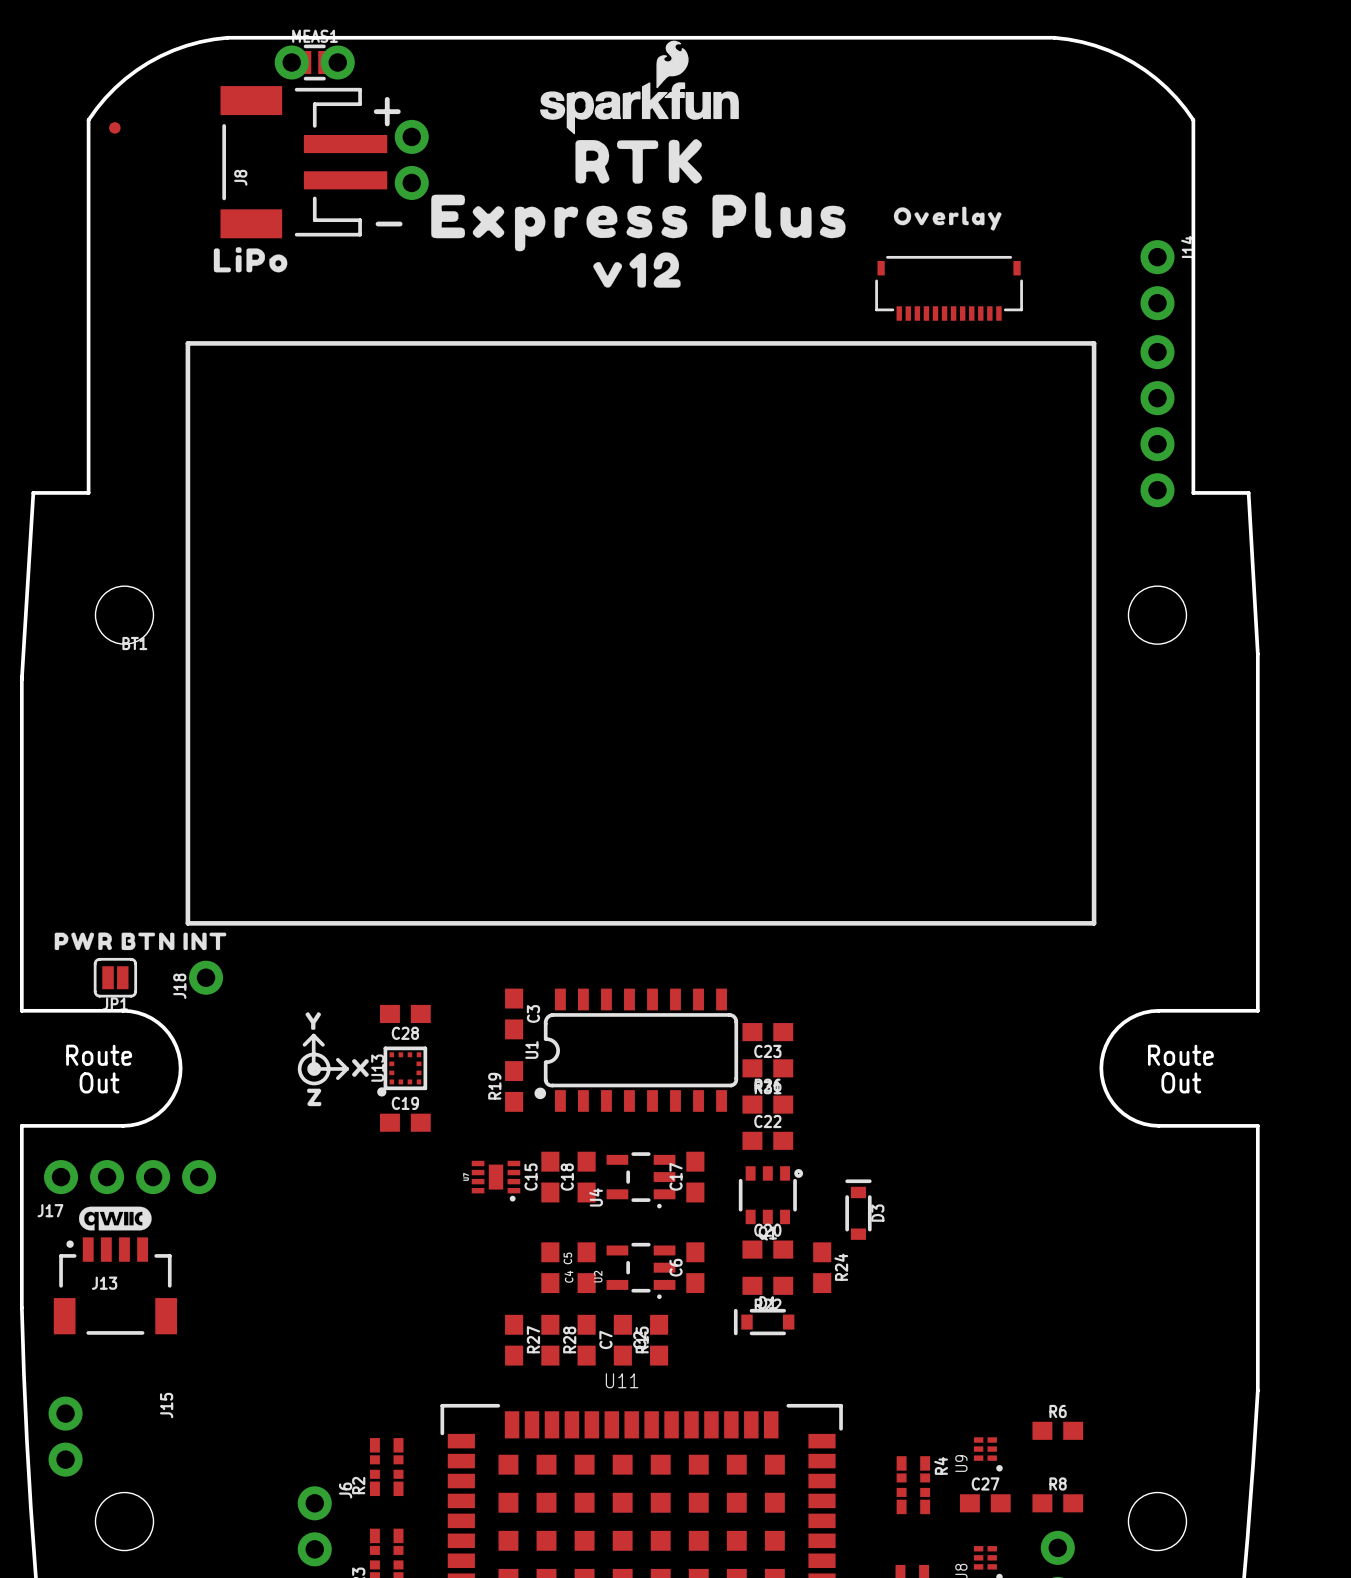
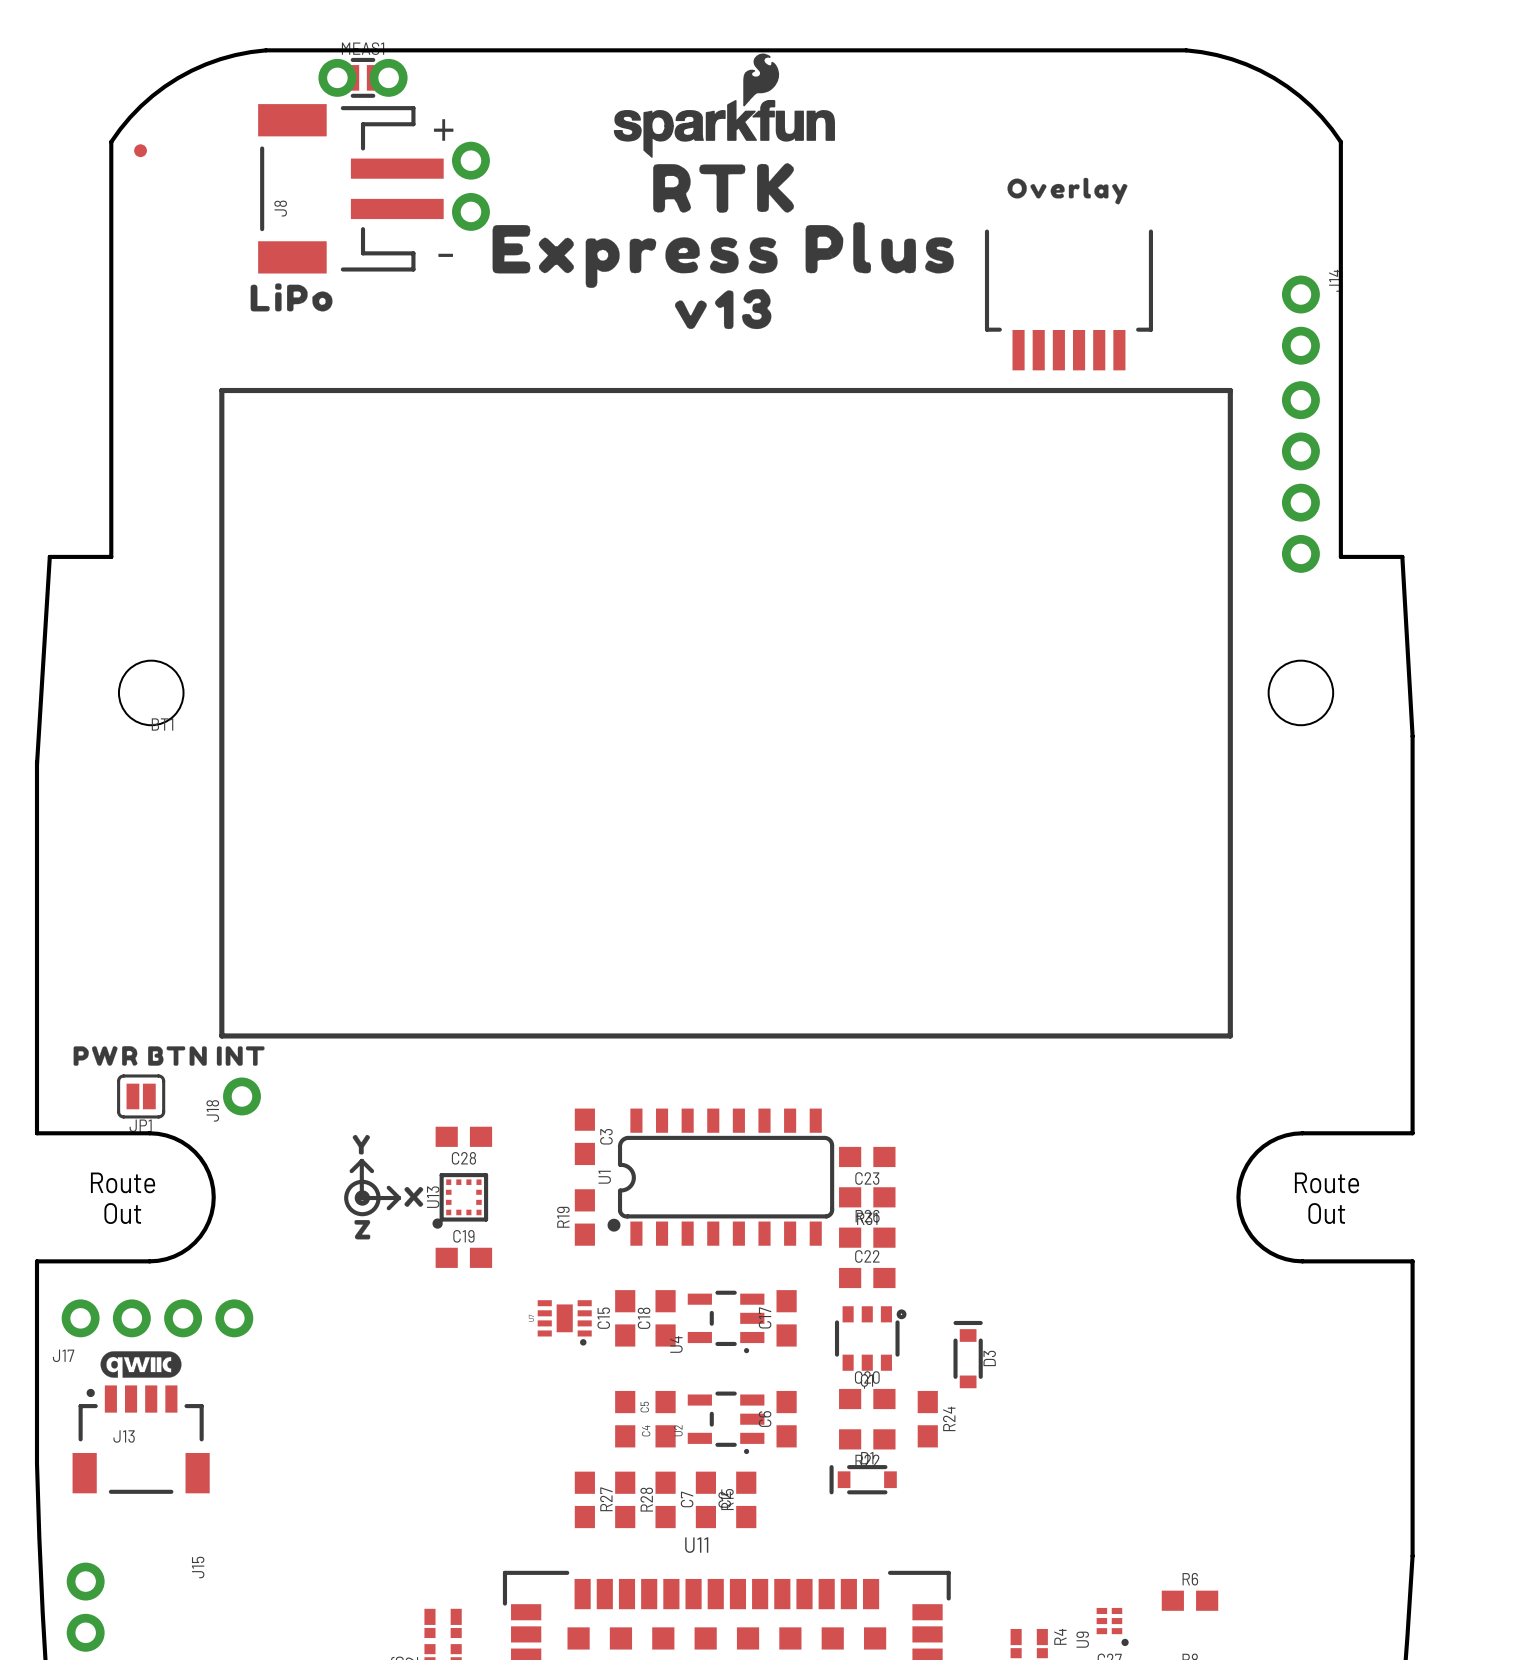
drawing position: (947, 218) -> (1067, 191)
drawing shape: [593, 252, 681, 288] -> [674, 289, 772, 330]
part: none -> (1068, 299)
part: (949, 288) -> none

